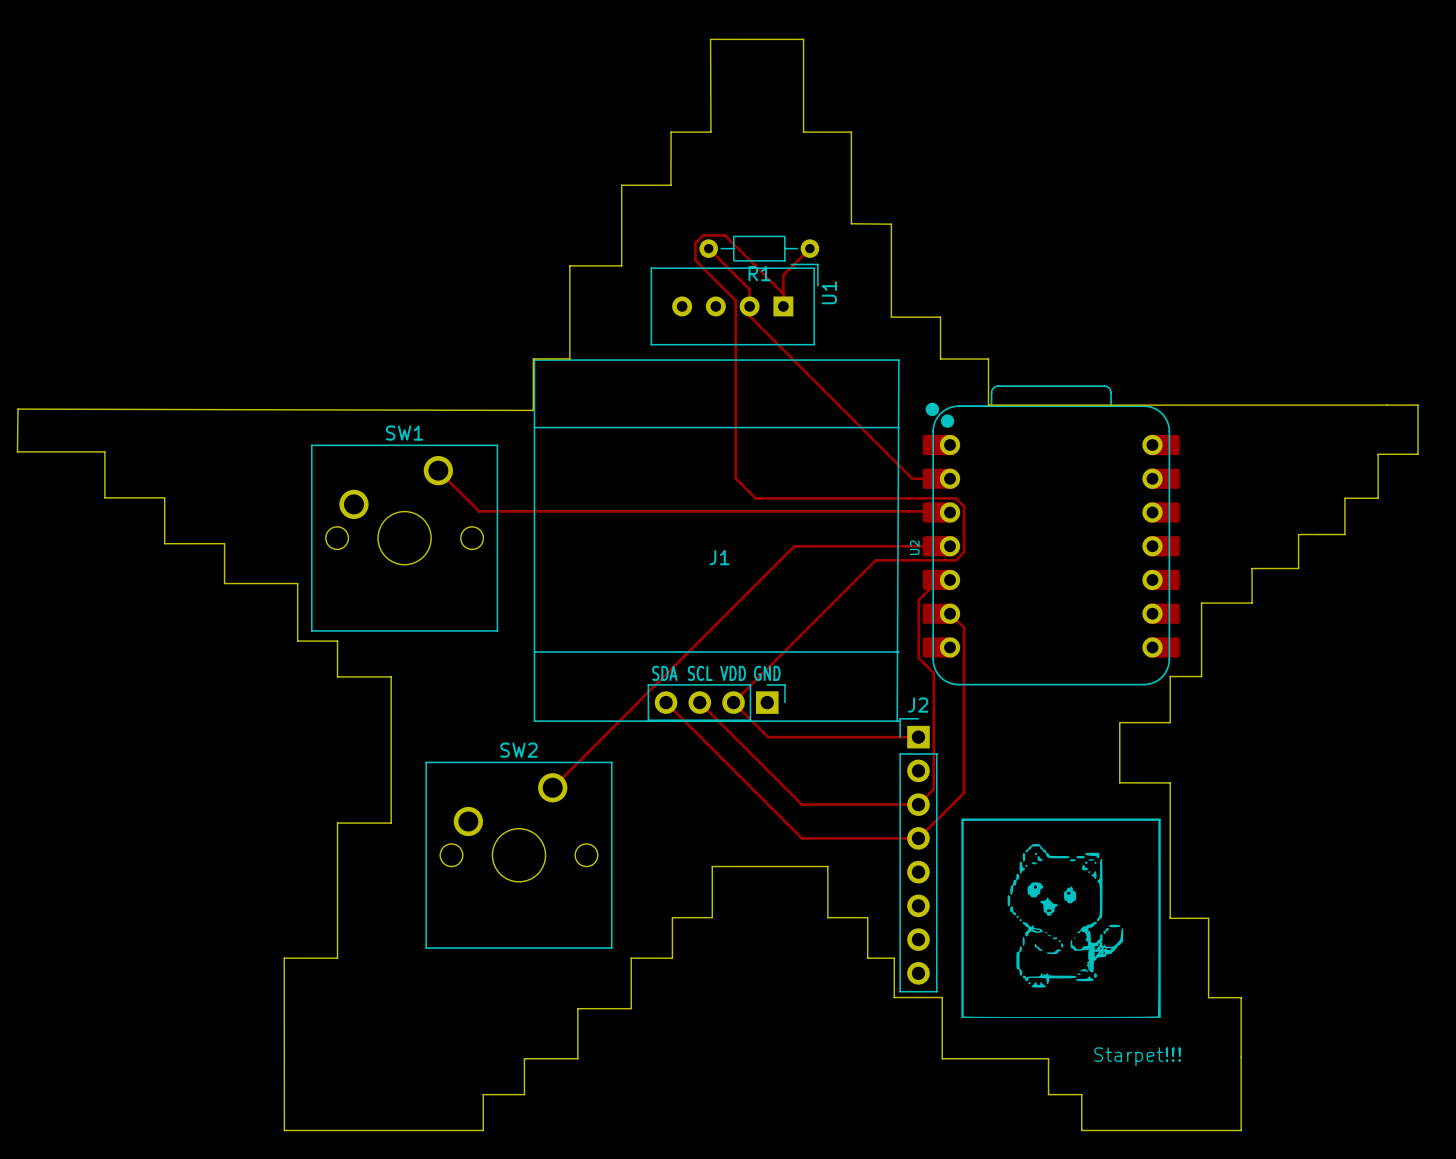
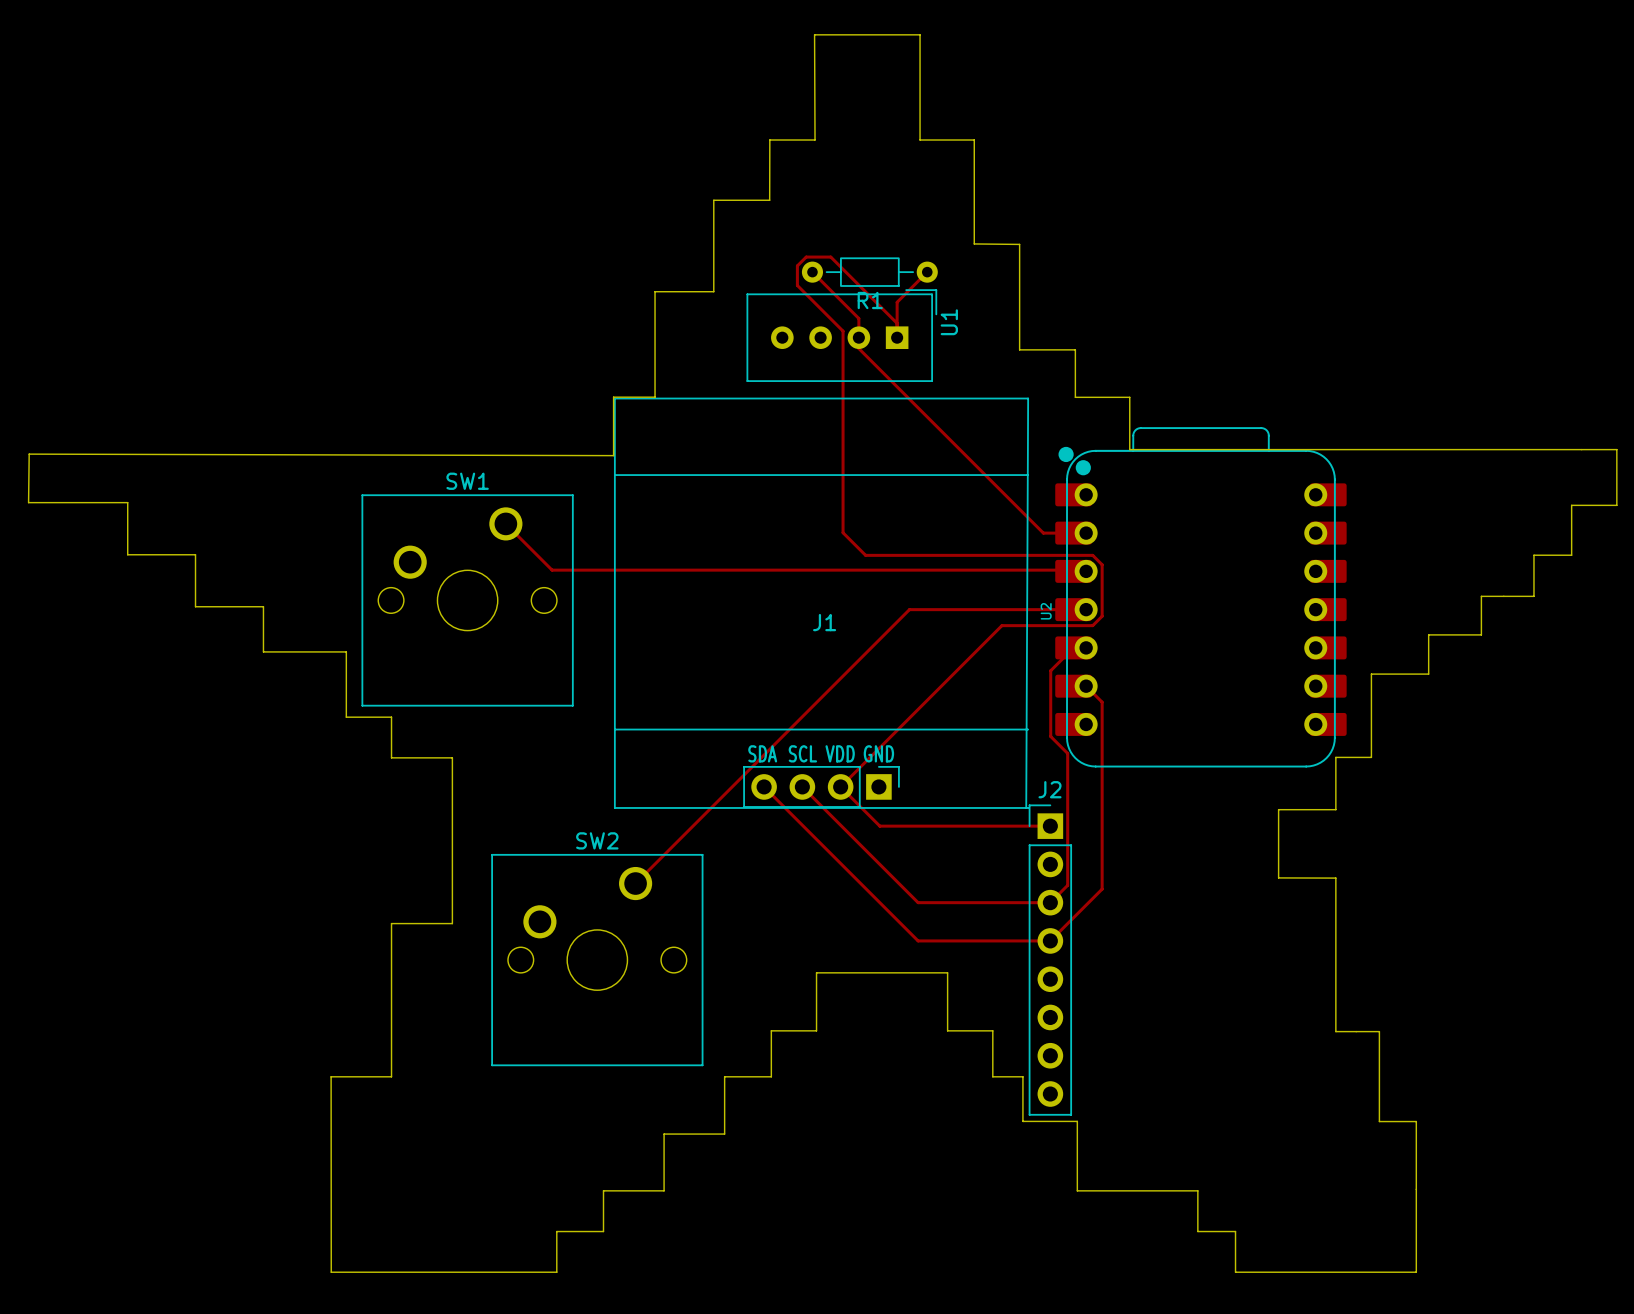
drawing: [961, 818, 1161, 1018] -> none
text: Starpet!!! (1137, 1056) -> none

